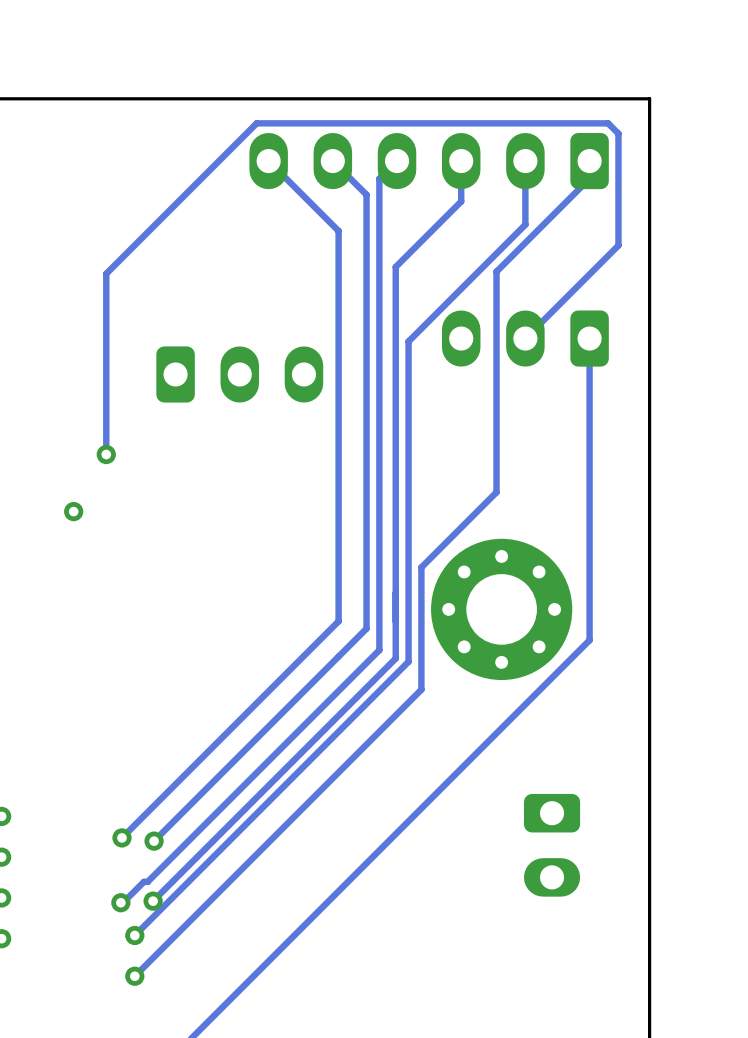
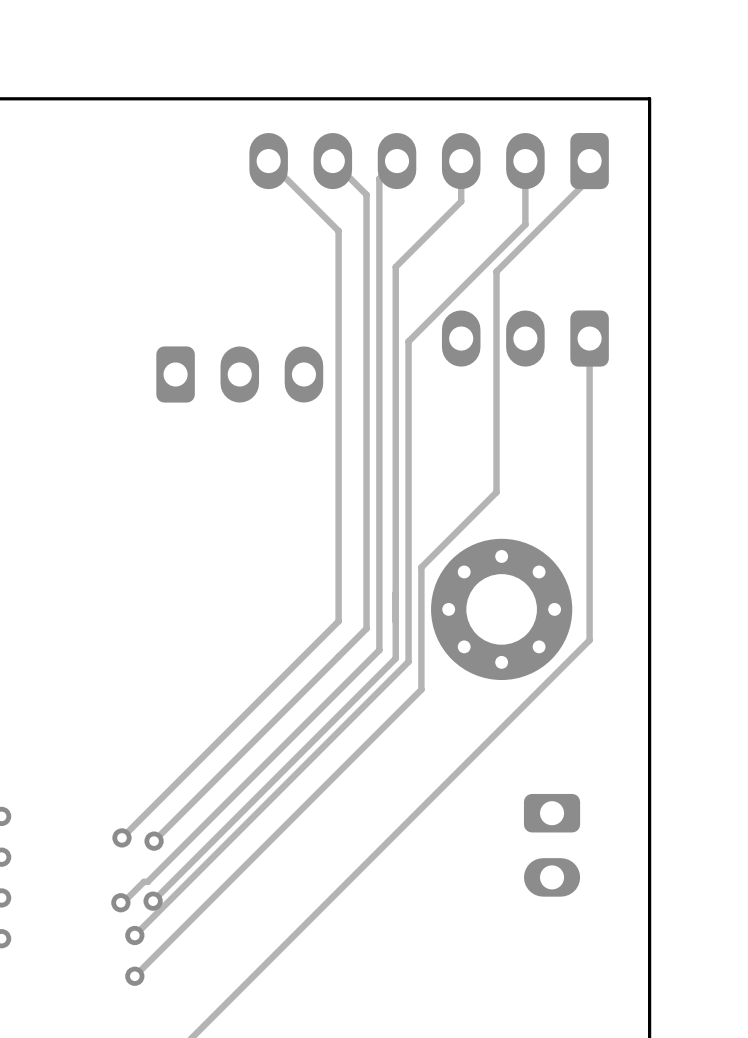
track: (525, 338) (618, 245) (618, 133) (608, 123) (256, 123) (106, 273) (106, 454) -> none
via: (106, 454) -> none
via: (73, 511) -> none

